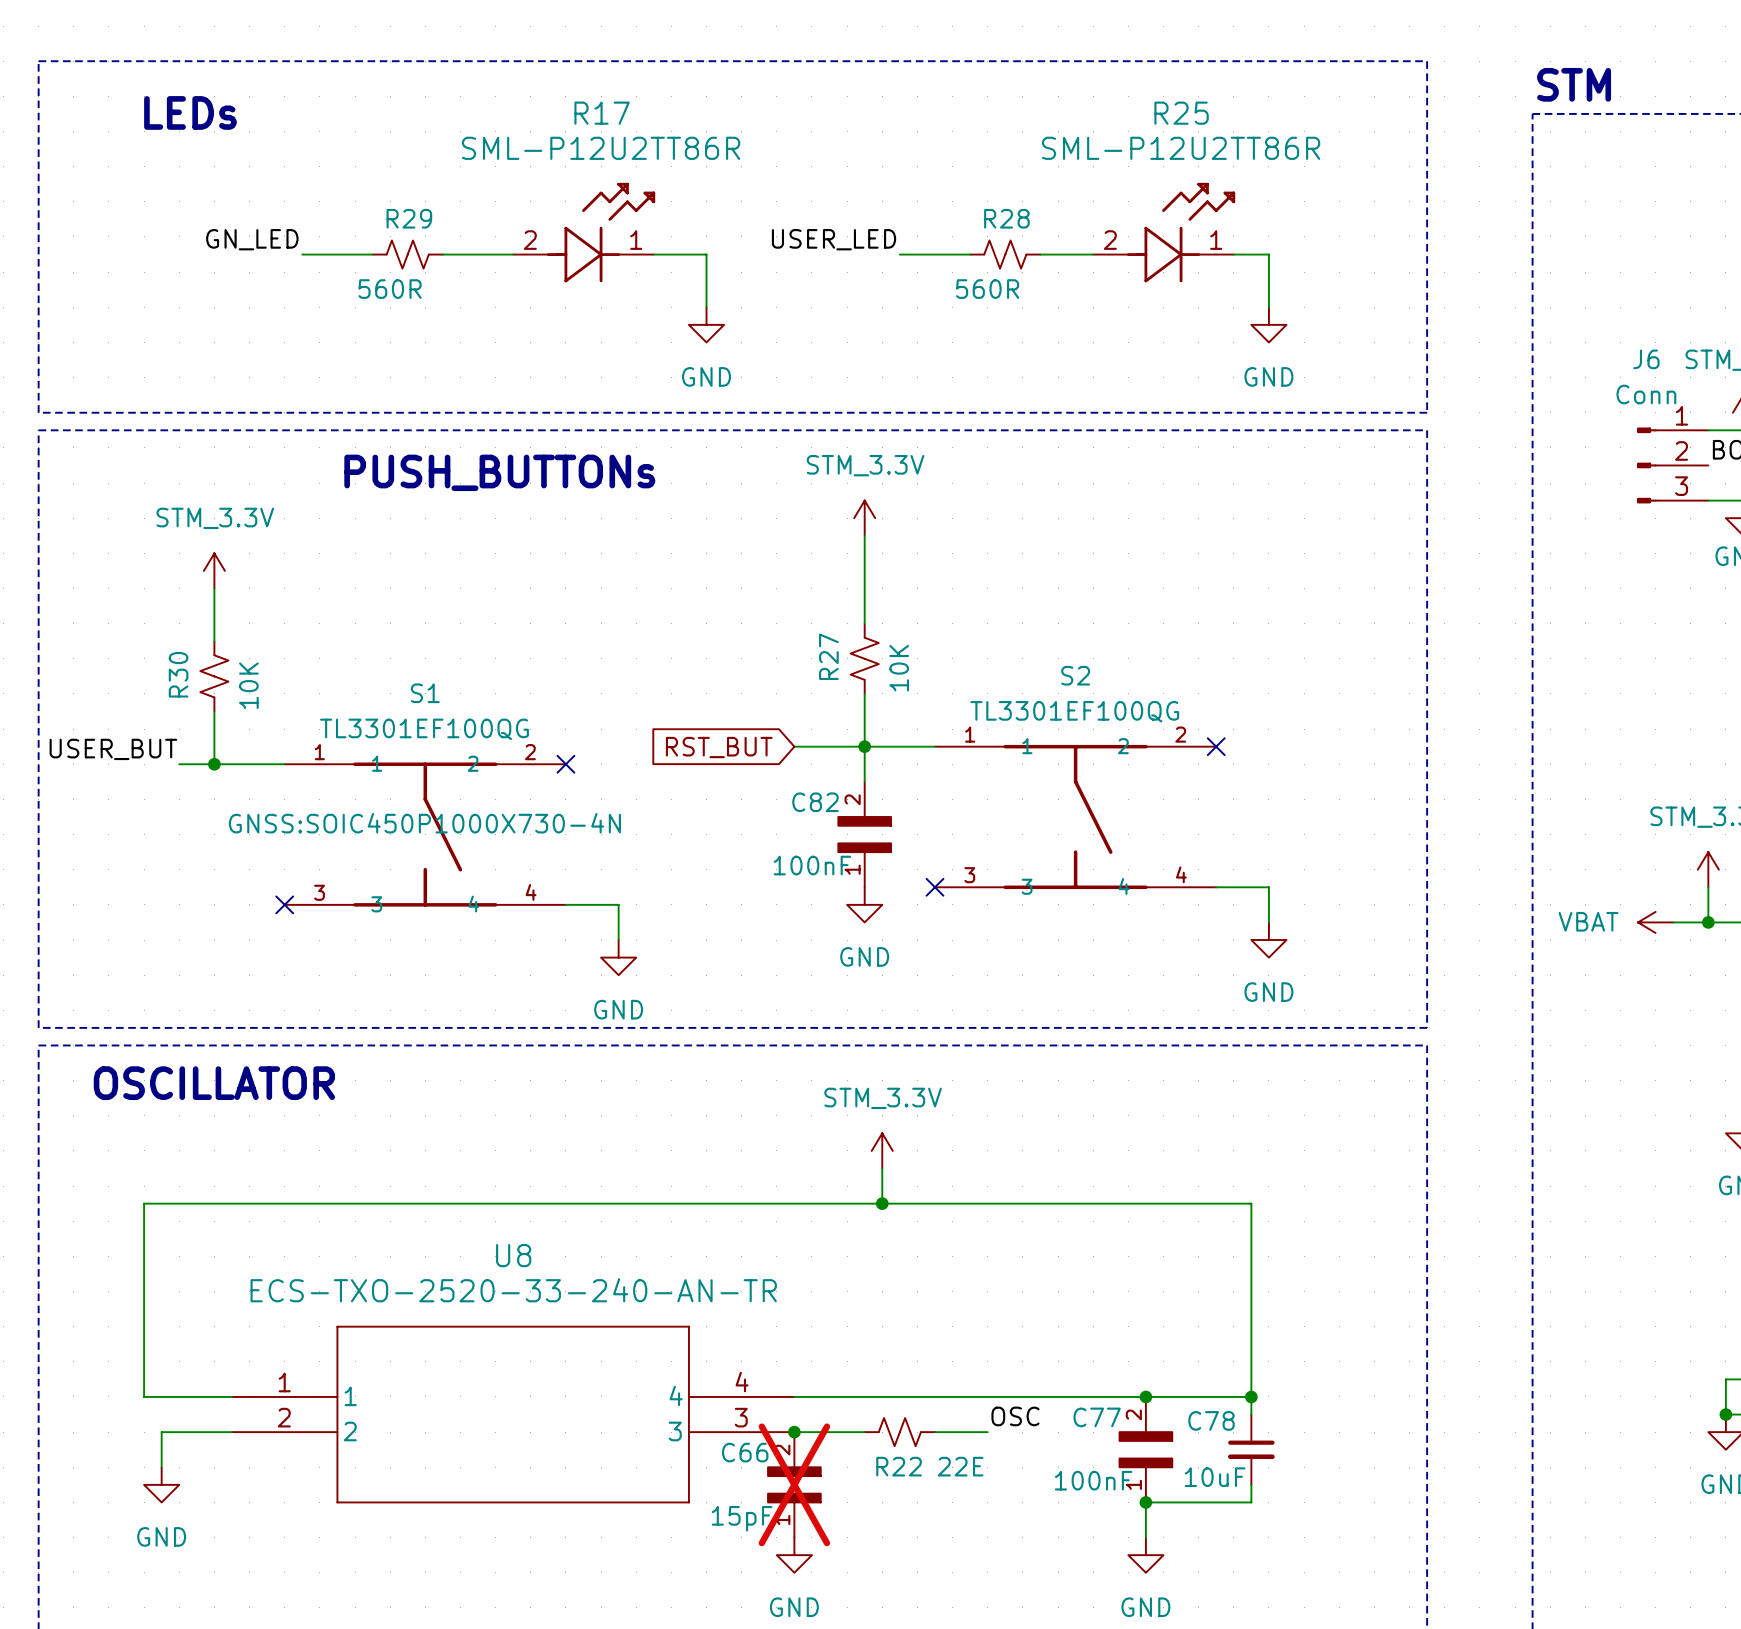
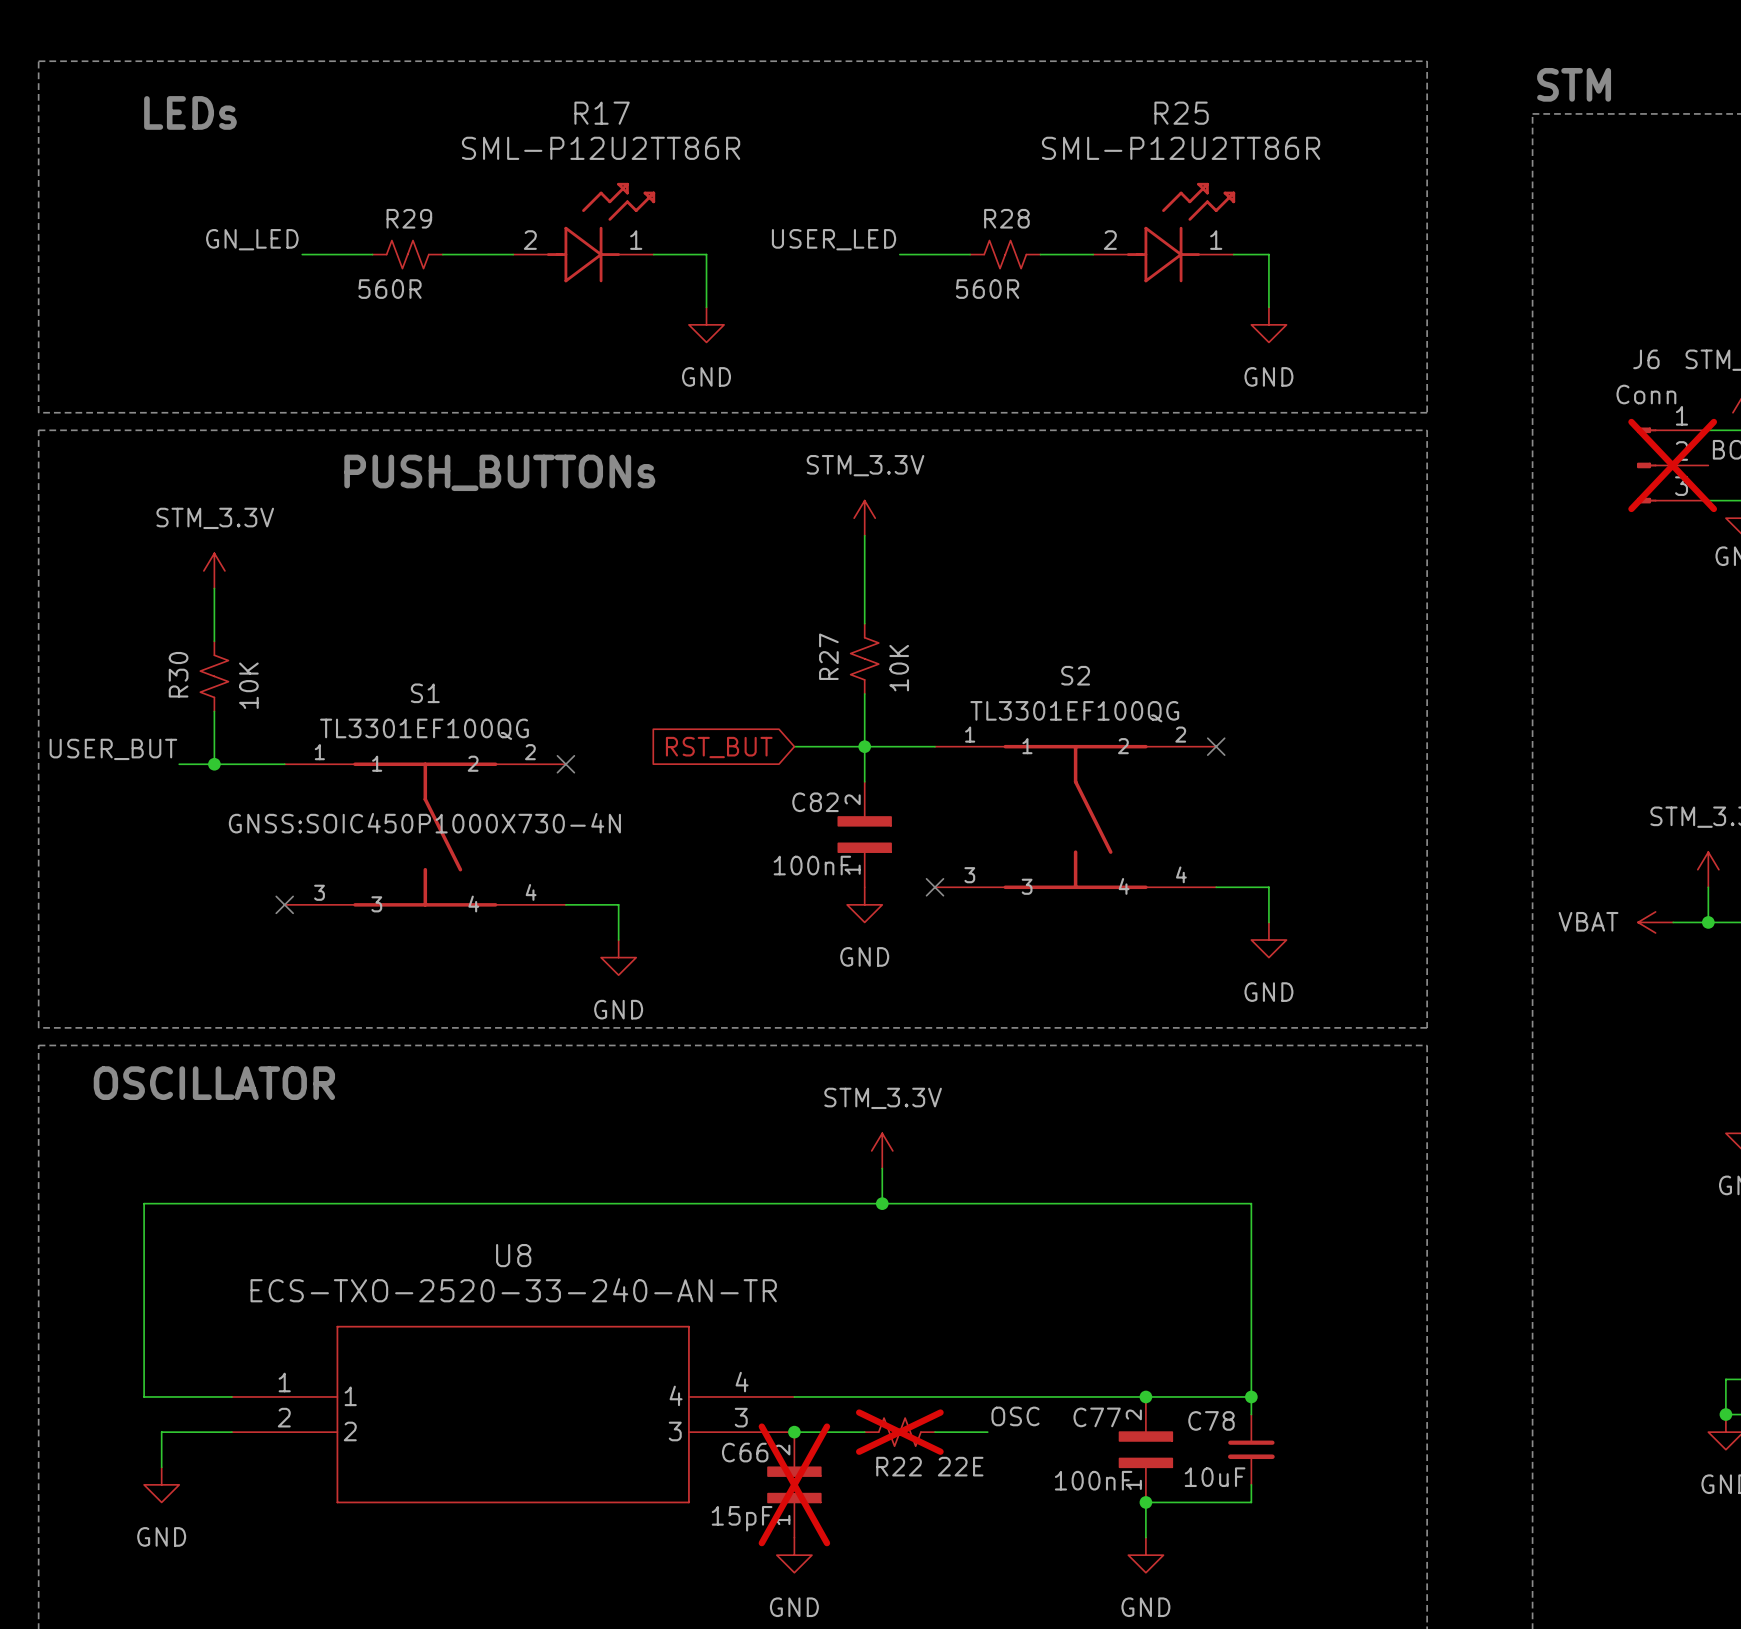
J6 do-not-place cross: none -> (1672, 465)
R22 do-not-place cross: none -> (899, 1432)

